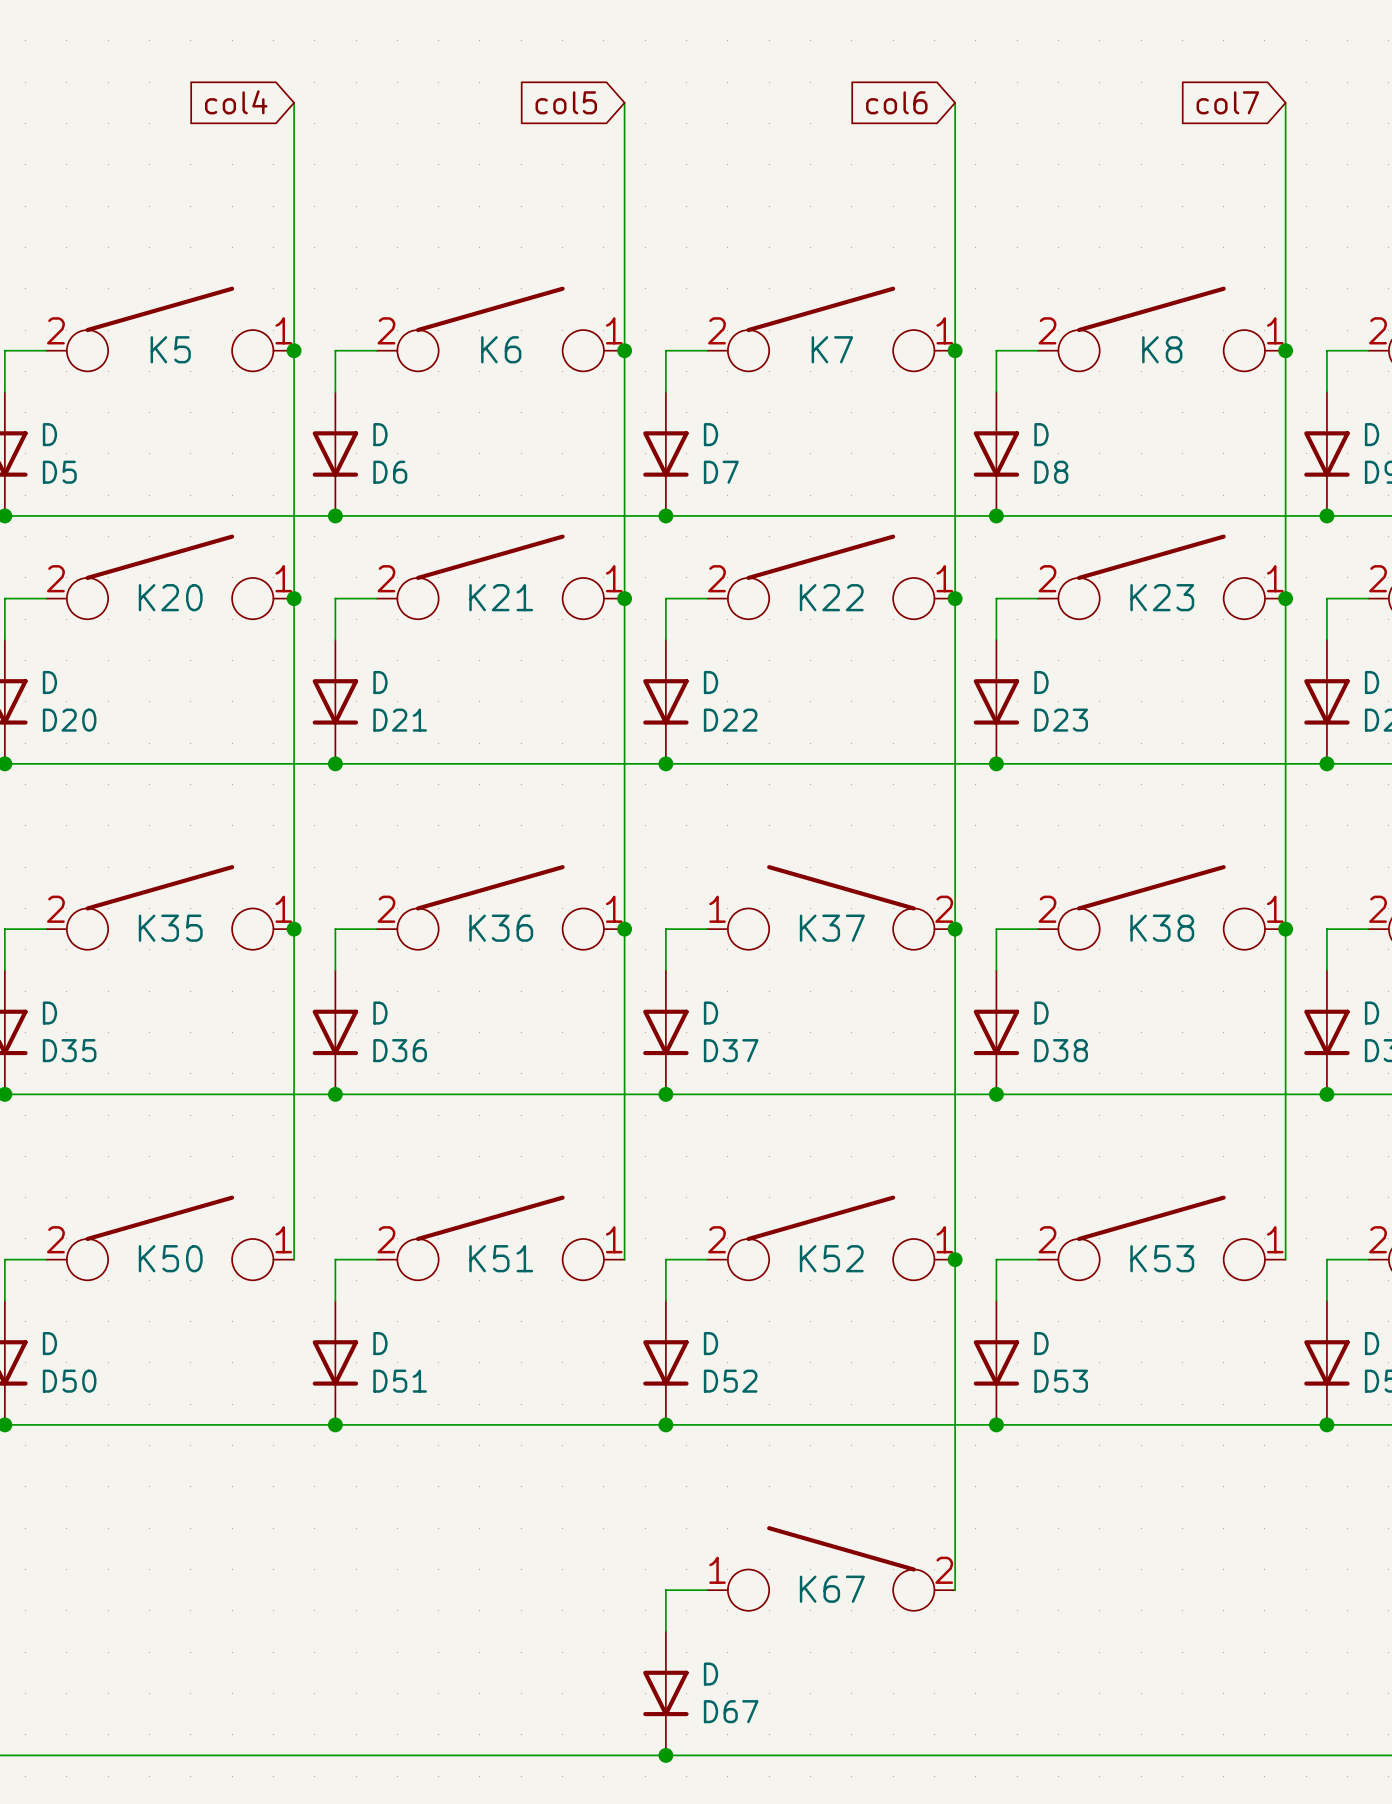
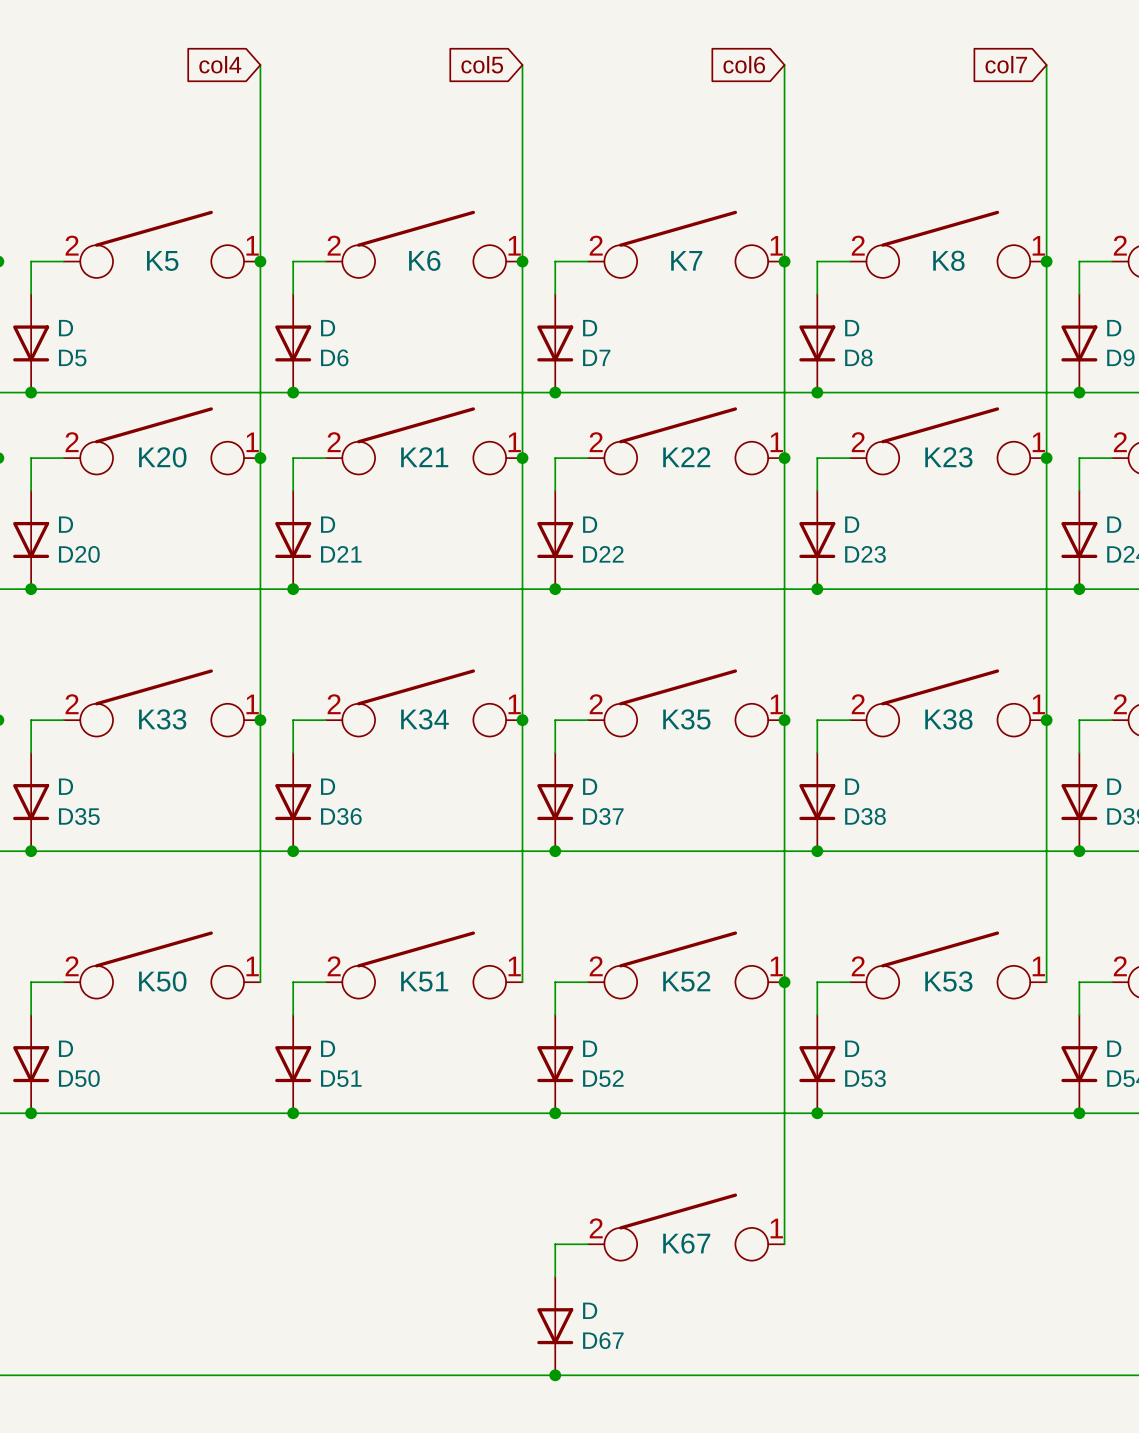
K37: (831, 907) -> none
K35: none -> (686, 702)
K35 name: K35 (170, 928) -> K33 (162, 719)
K36 name: K36 (501, 928) -> K34 (424, 719)
K67 flip: as is (831, 1568) -> left-right (686, 1227)

